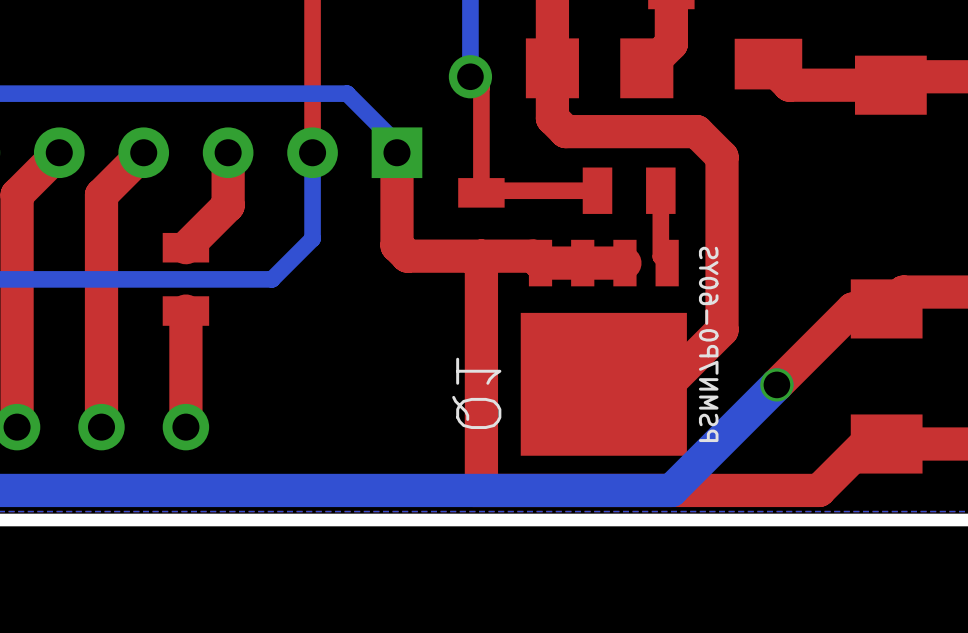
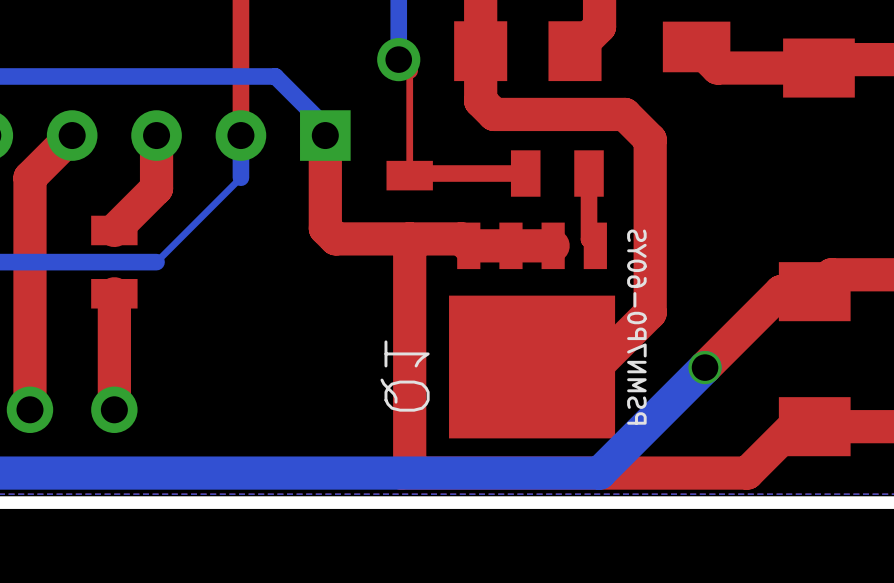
top track width: thick (481, 87) (481, 192) -> thin (409, 70) (409, 175)
bottom track: (312, 194) (312, 238) (272, 279) (228, 279) -> (240, 177) (156, 262)

